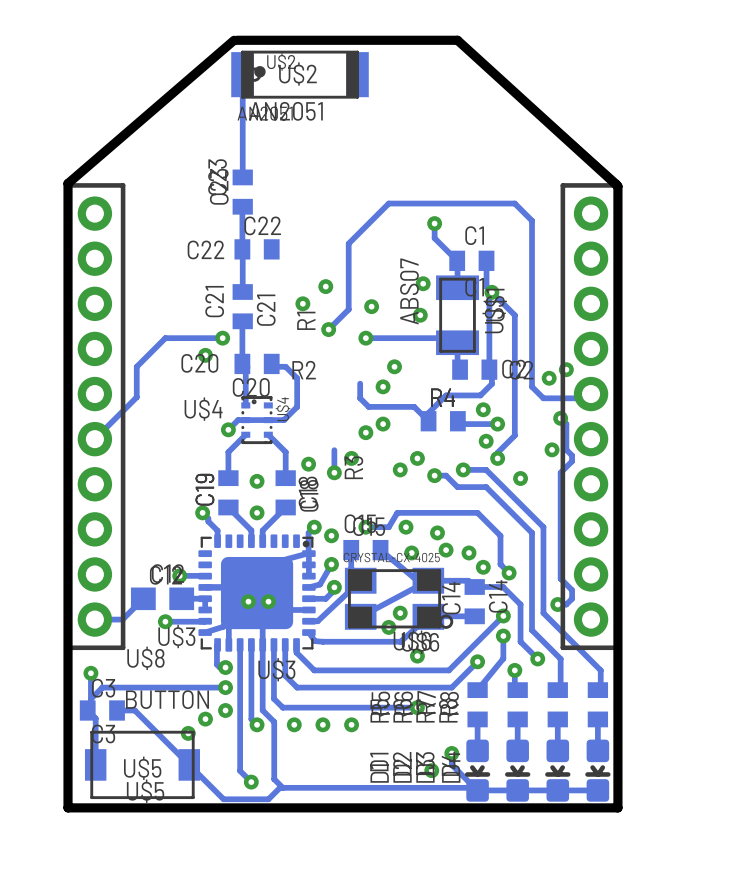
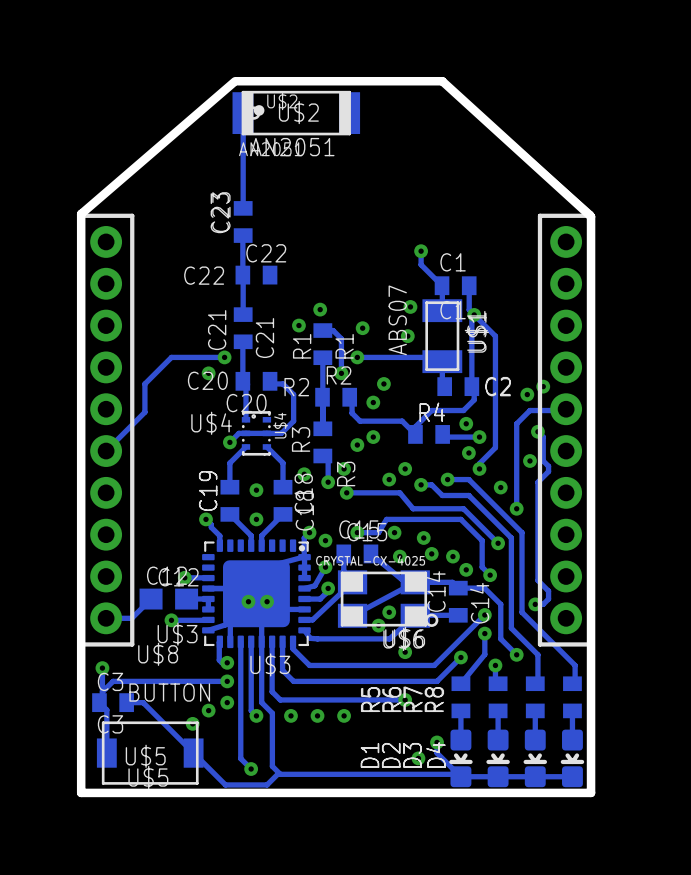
track: none -> (322, 330) (333, 330) (341, 338) (341, 373)
R1: none -> (322, 344)
track: (328, 329) (348, 309) (348, 243) (388, 203) (514, 203) (532, 220) (532, 386) (543, 398) (586, 398) (589, 395) -> (516, 508) (516, 423) (529, 410) (564, 410)
via position: (328, 329) -> (341, 373)
track: none -> (322, 357) (322, 428) (322, 397) (322, 421)
R2: none -> (336, 397)
R3: none -> (322, 442)
track: none -> (346, 492) (399, 492) (413, 508) (463, 508) (498, 543)
via: none -> (346, 492)
via: none -> (516, 508)
via: none -> (498, 543)

